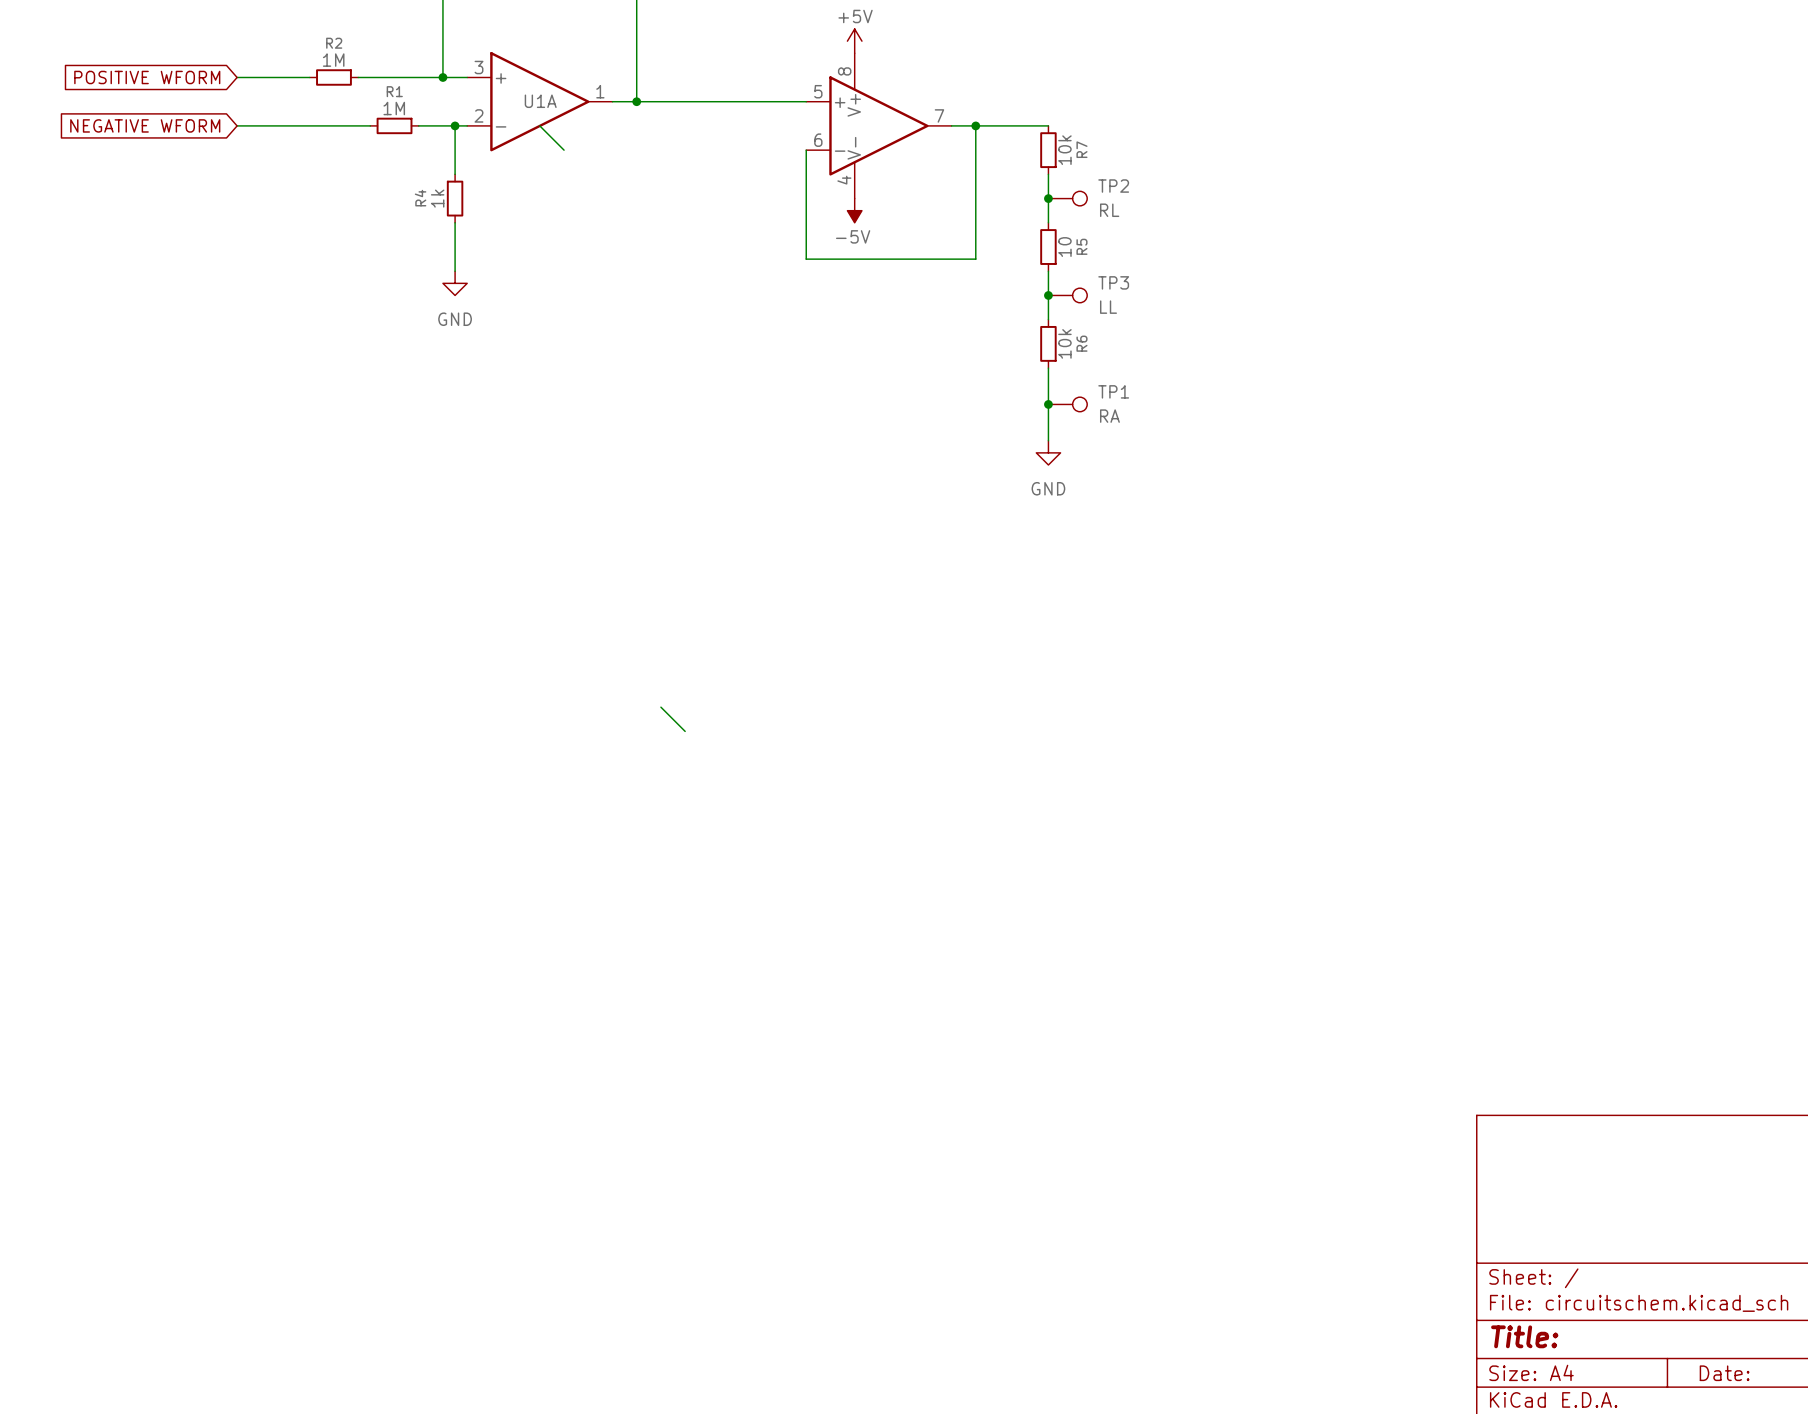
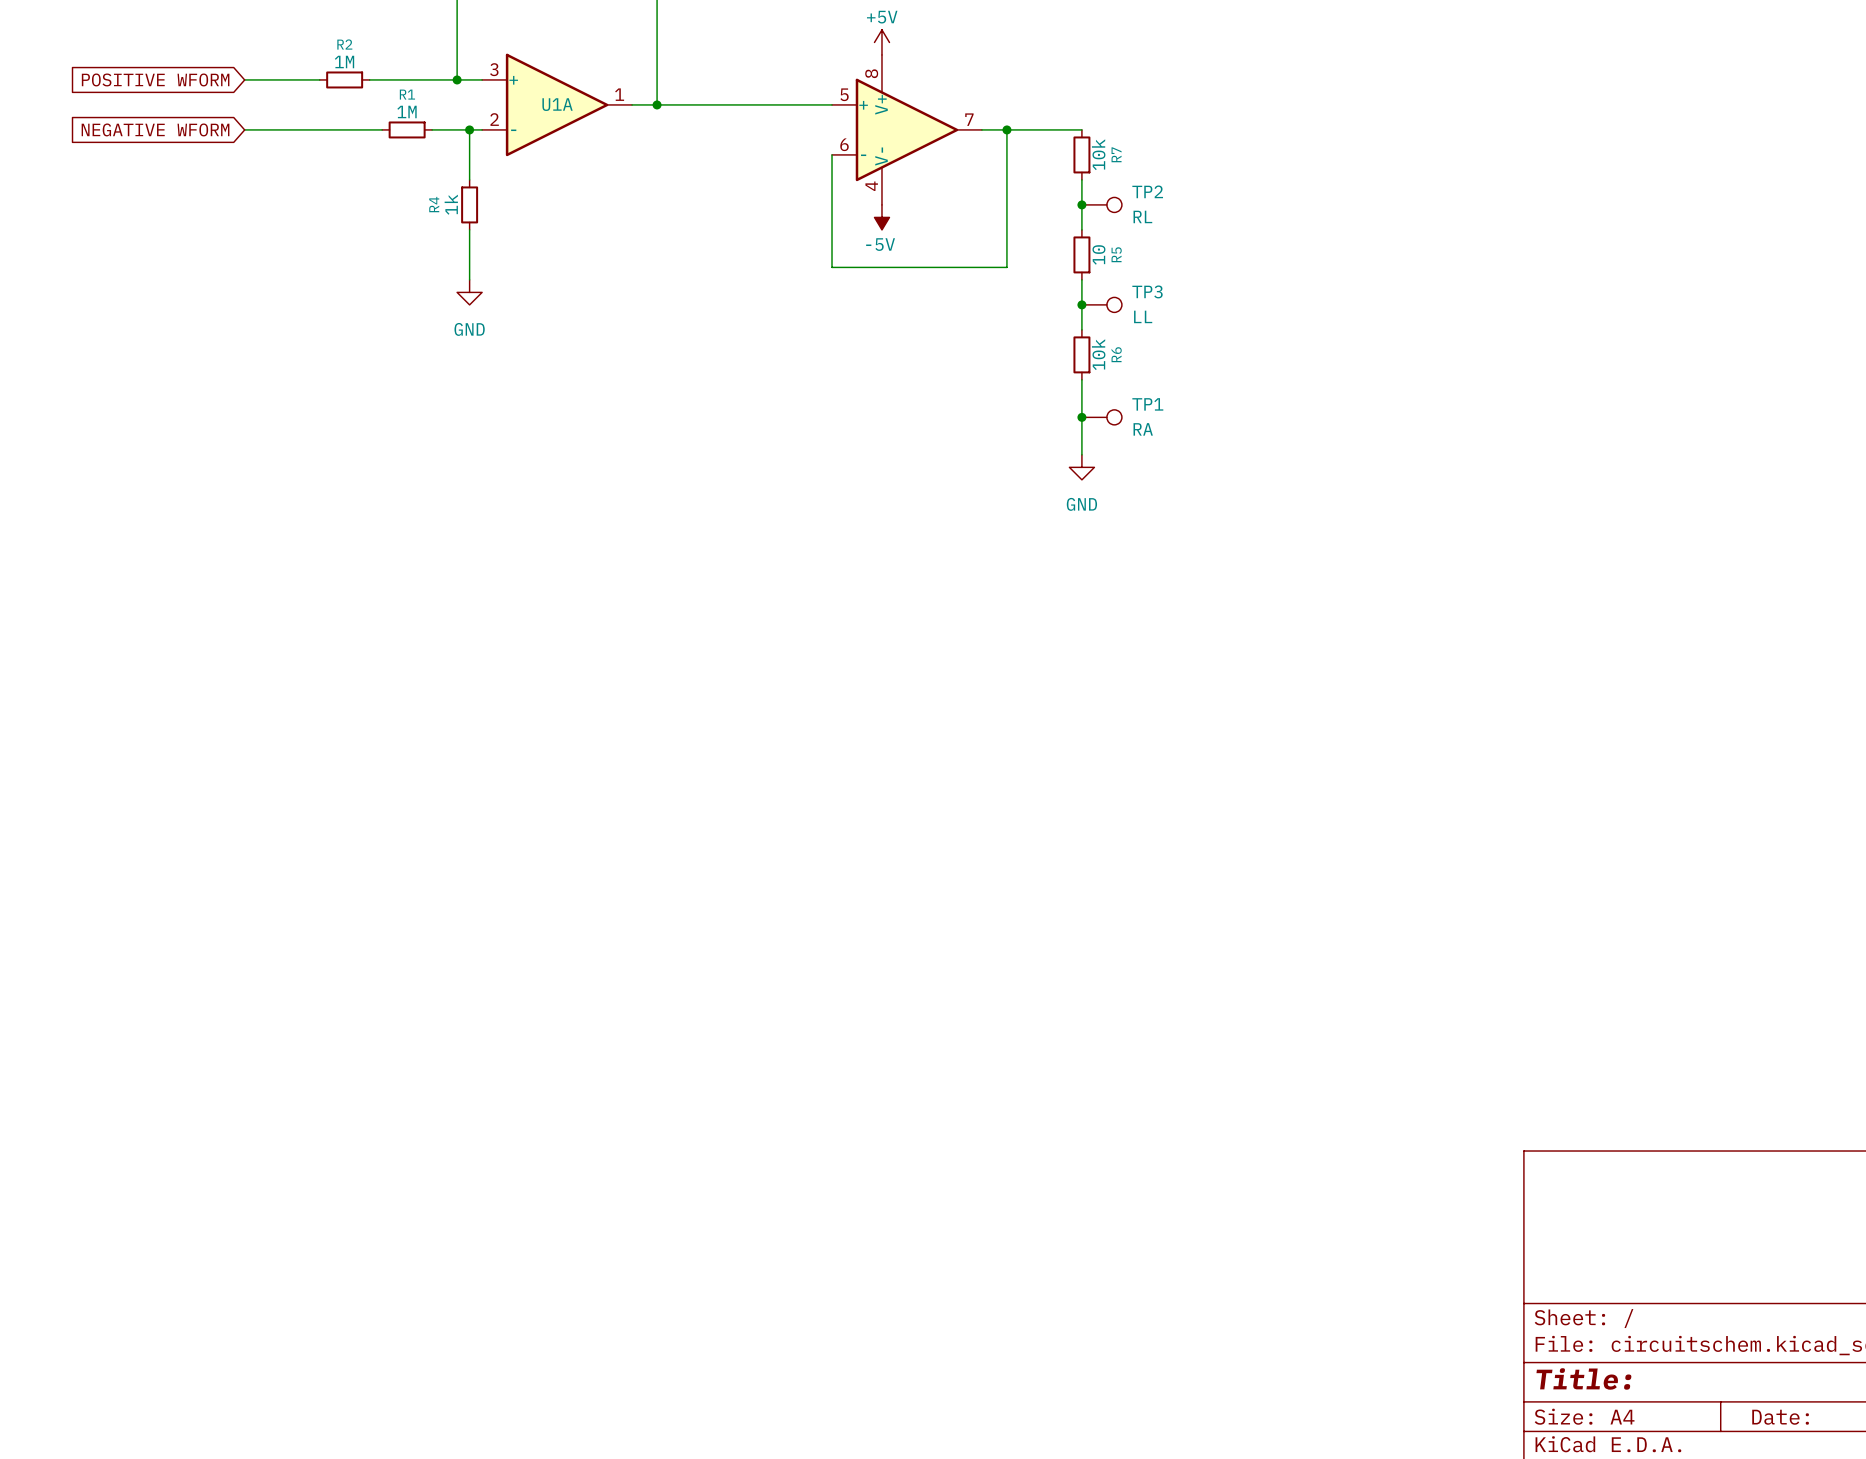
wire: (539, 125) (564, 150) -> none
wire: (660, 707) (685, 731) -> none

